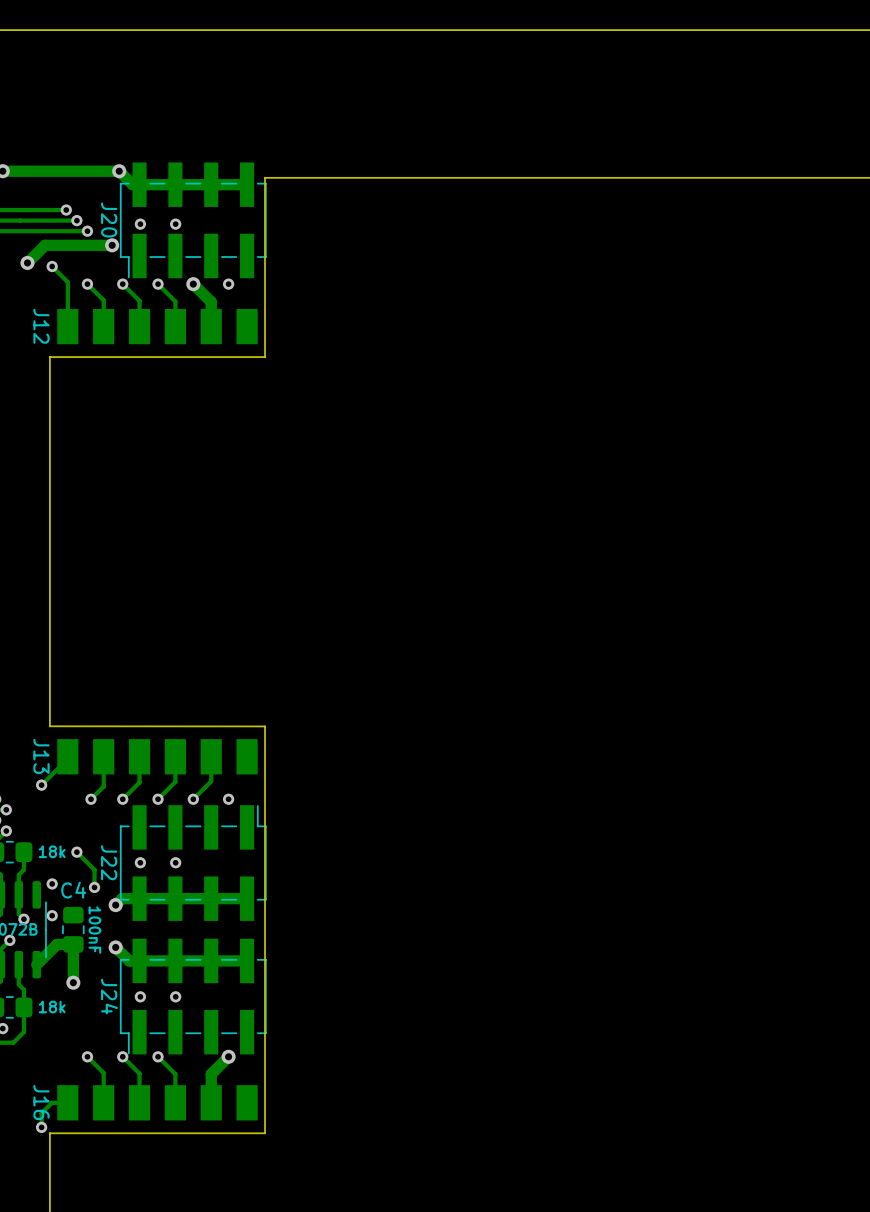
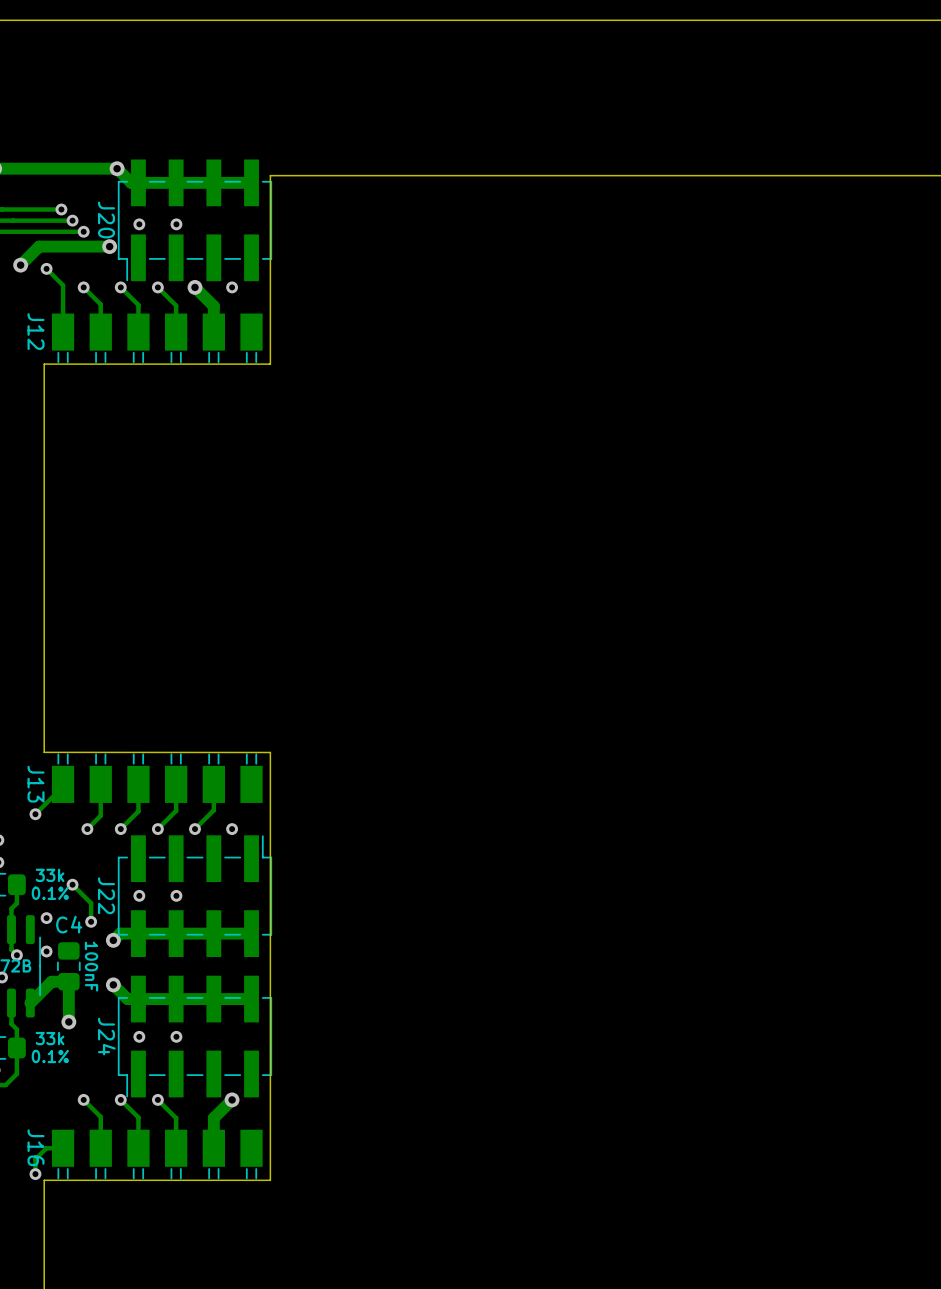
J12 side: bottom (157, 326) -> top (157, 338)
J13 side: bottom (157, 756) -> top (157, 778)
text: none -> 33k (50, 875)
part value: 18k (52, 851) -> none
text: none -> 0.1% (50, 893)
text: none -> 33k (50, 1038)
part value: 18k (52, 1007) -> none
text: none -> 0.1% (50, 1056)
J16 side: bottom (157, 1102) -> top (157, 1154)

